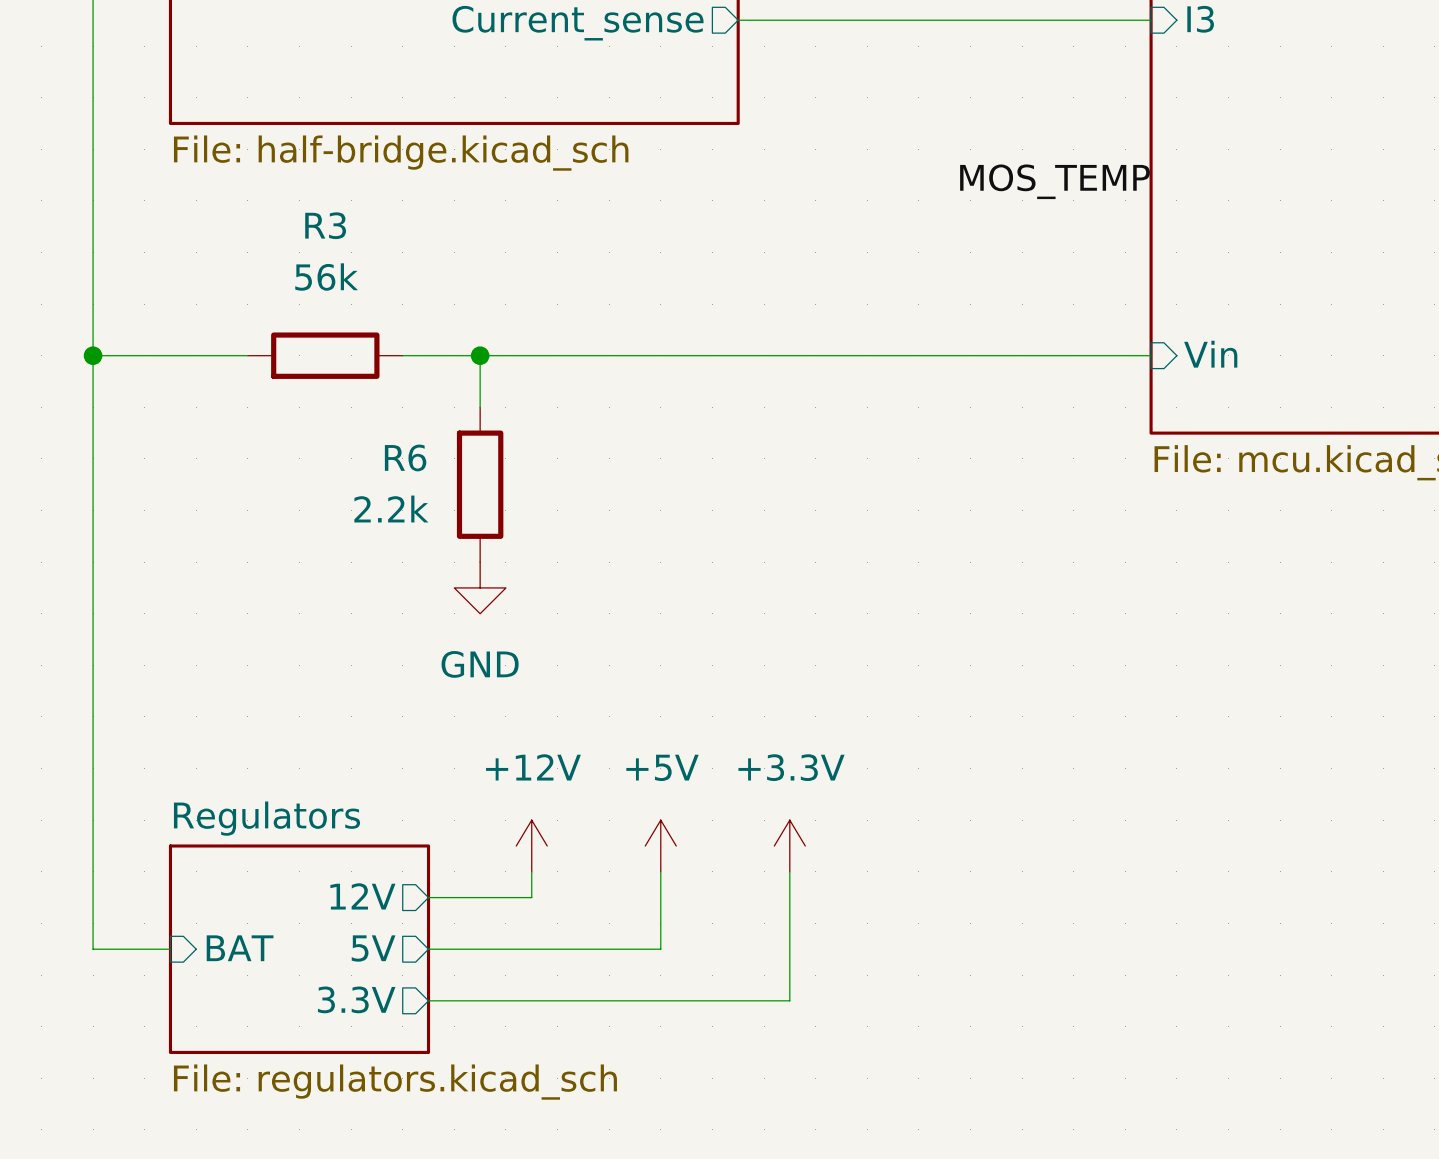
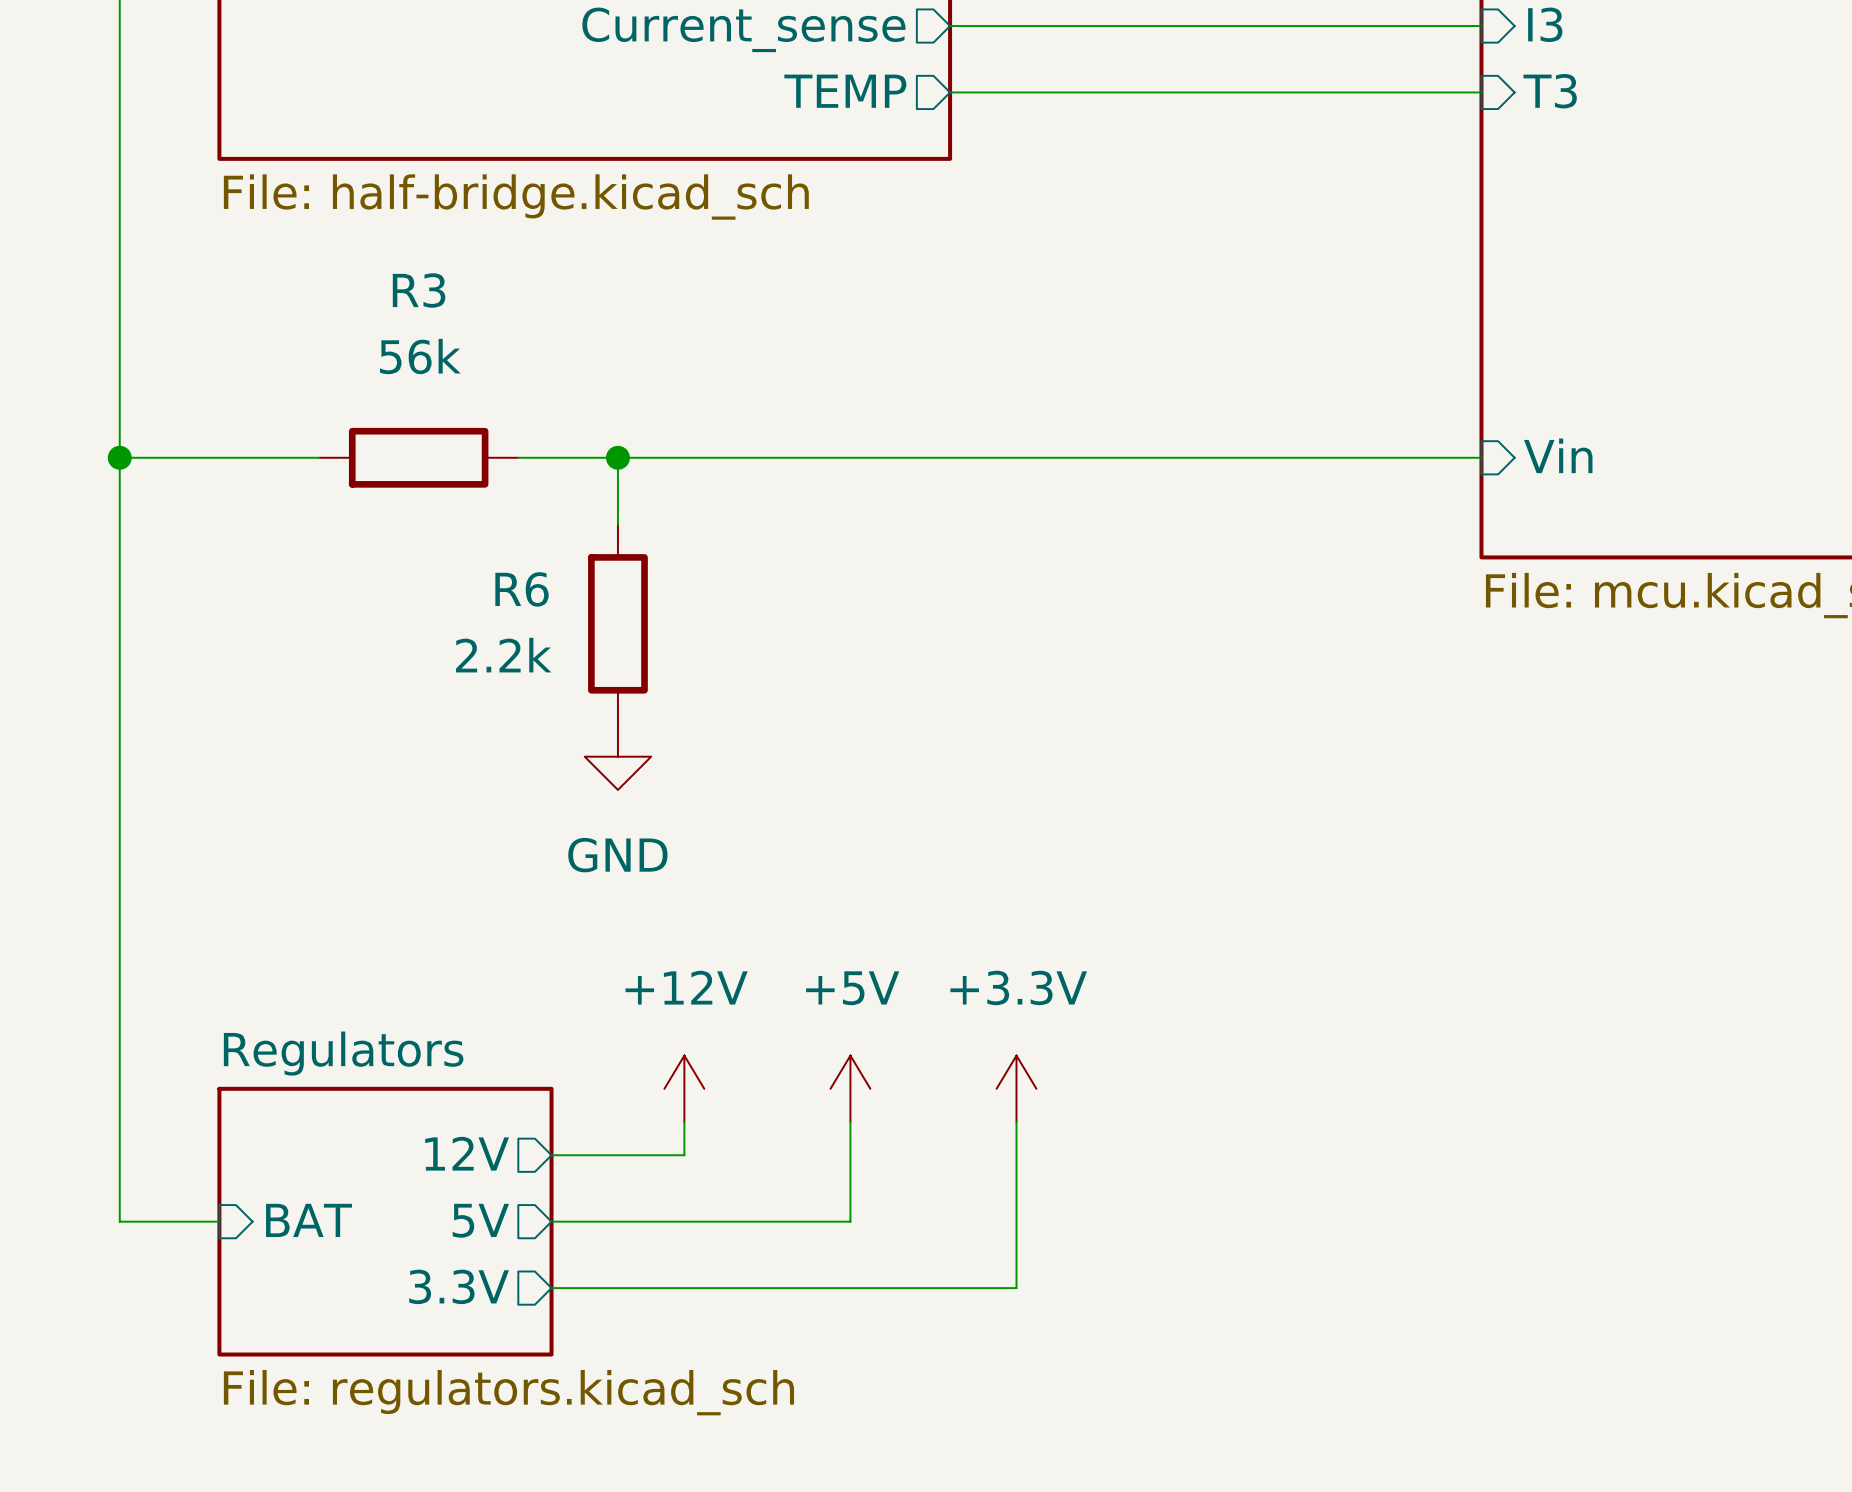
sheet pin: none -> TEMP (845, 91)
sheet pin: none -> T3 (1550, 91)
wire: none -> (950, 92) (1481, 92)
label: MOS_TEMP (1055, 181) -> none

